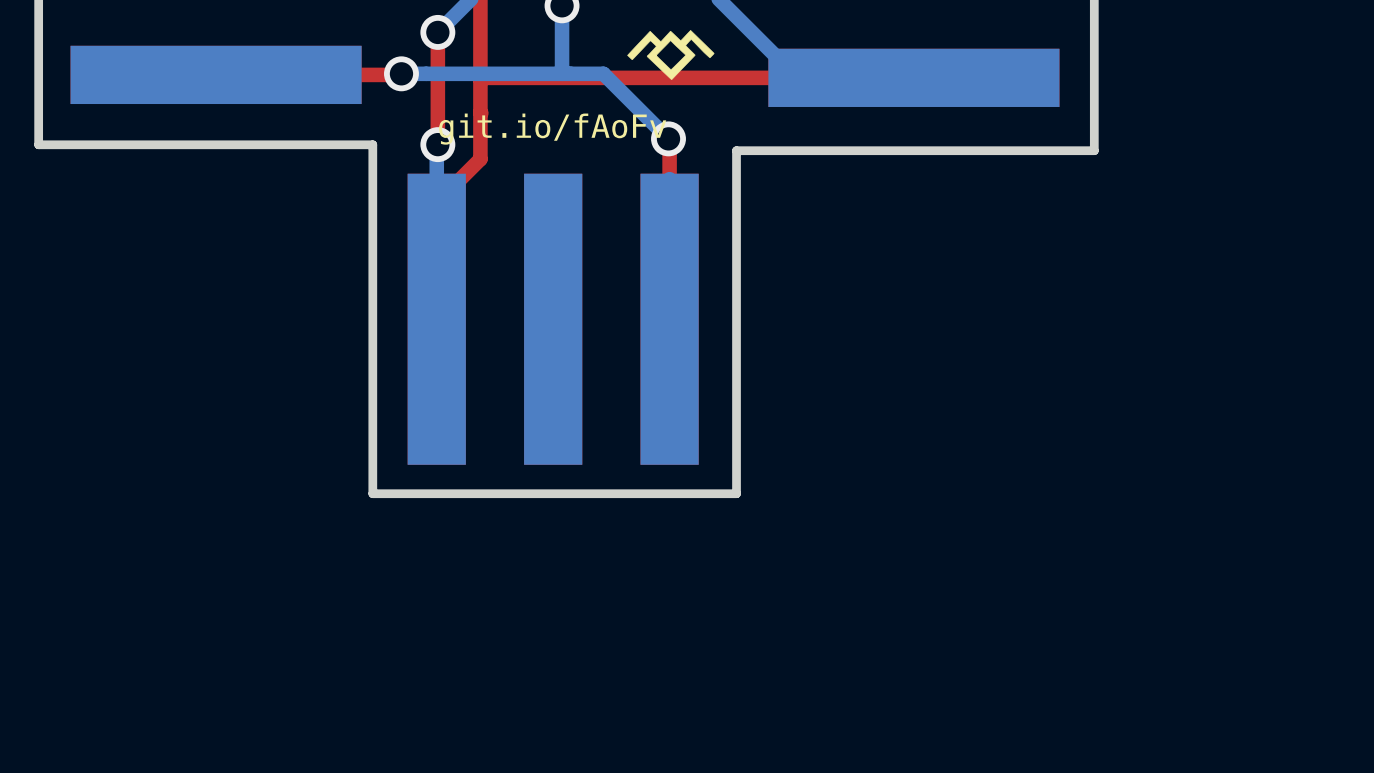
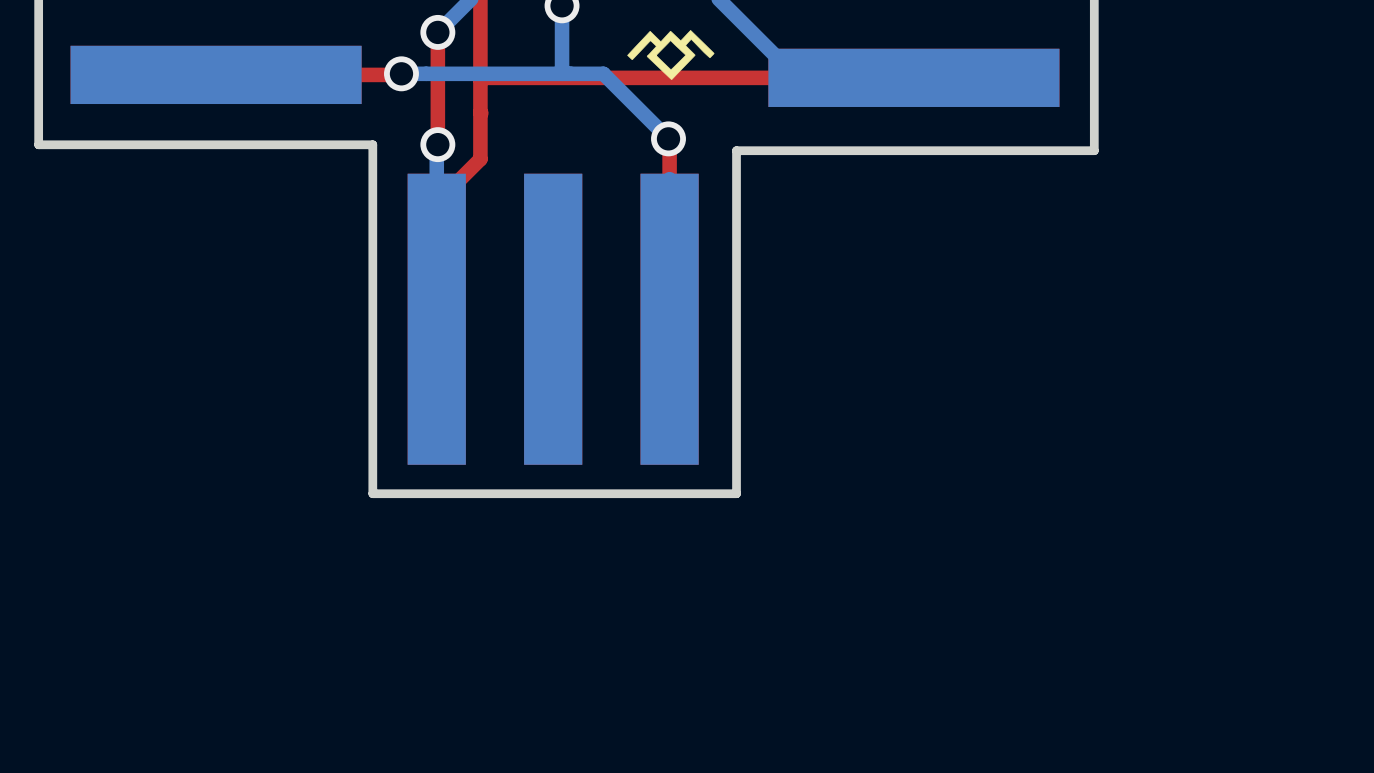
text: git.io/fAoFv (552, 129) -> none

